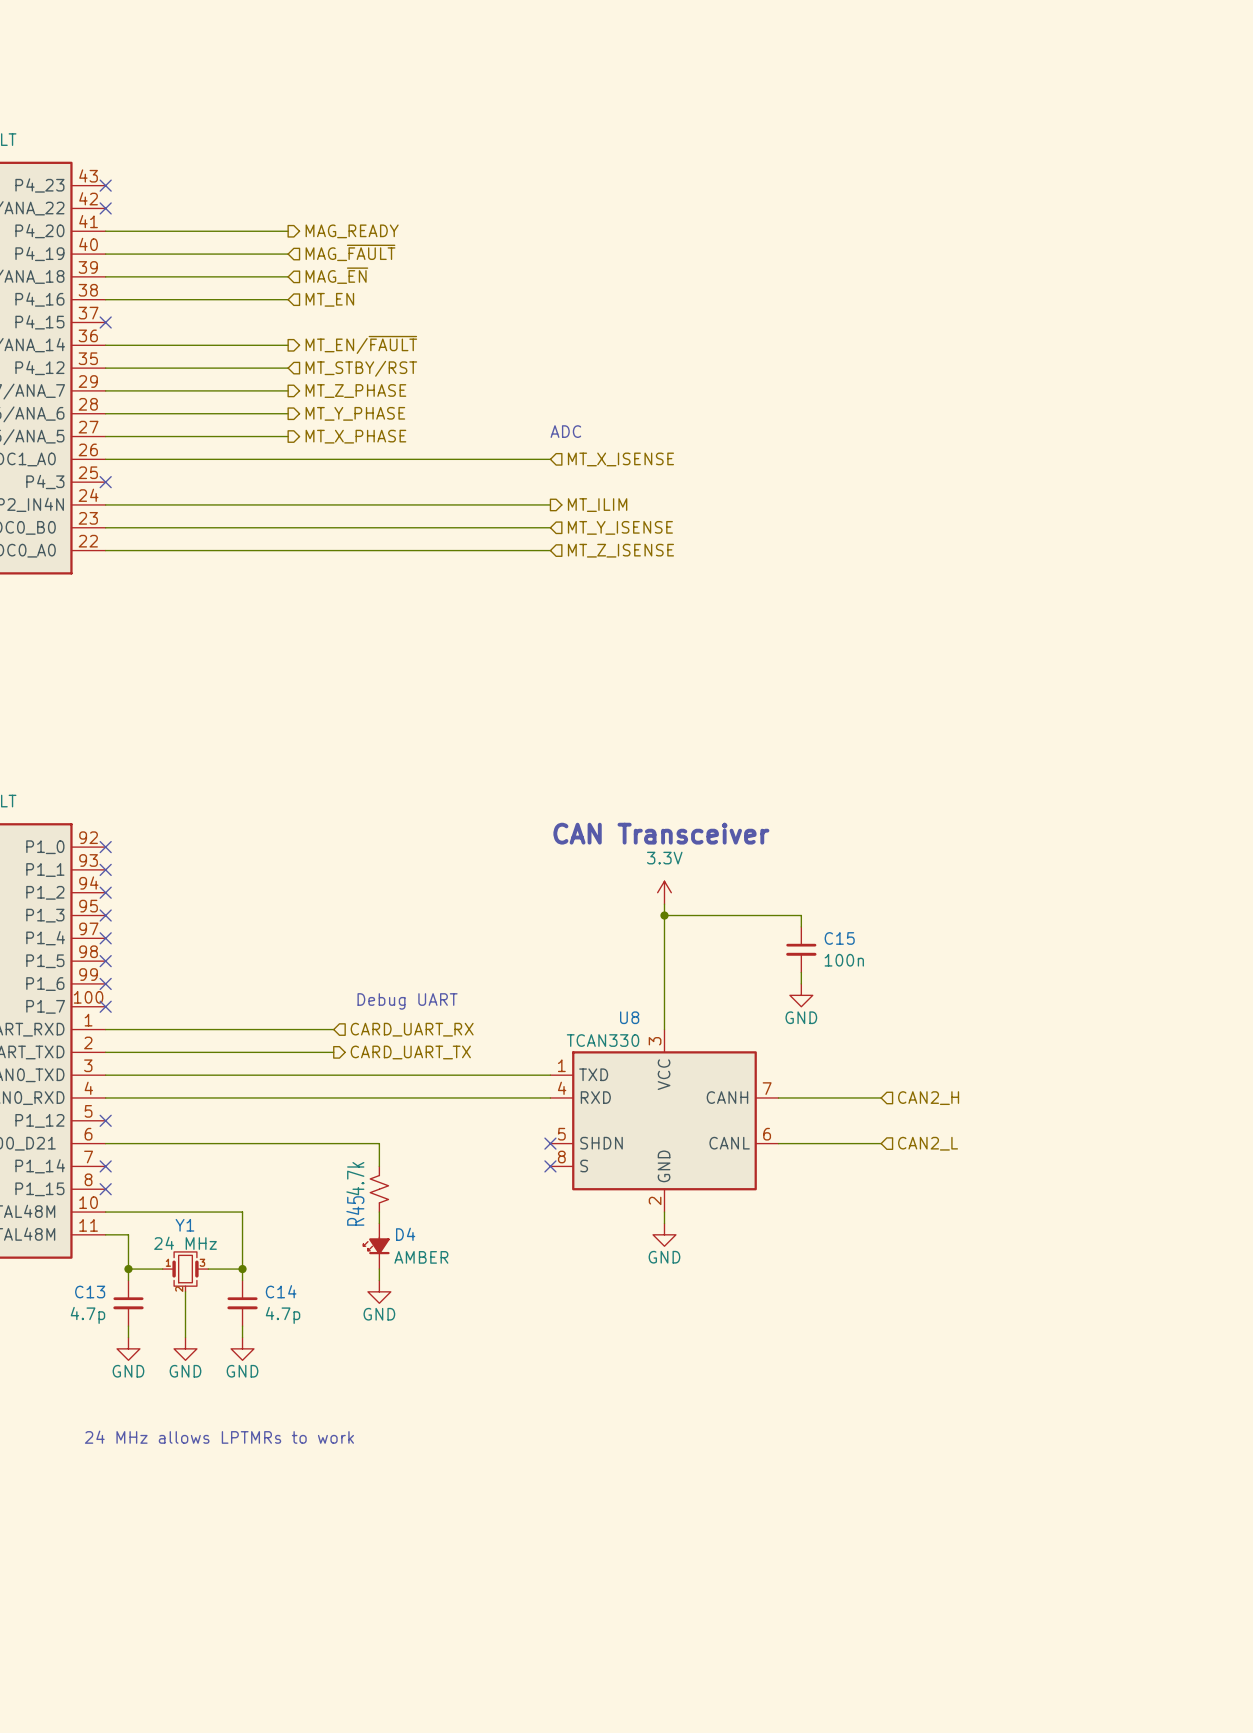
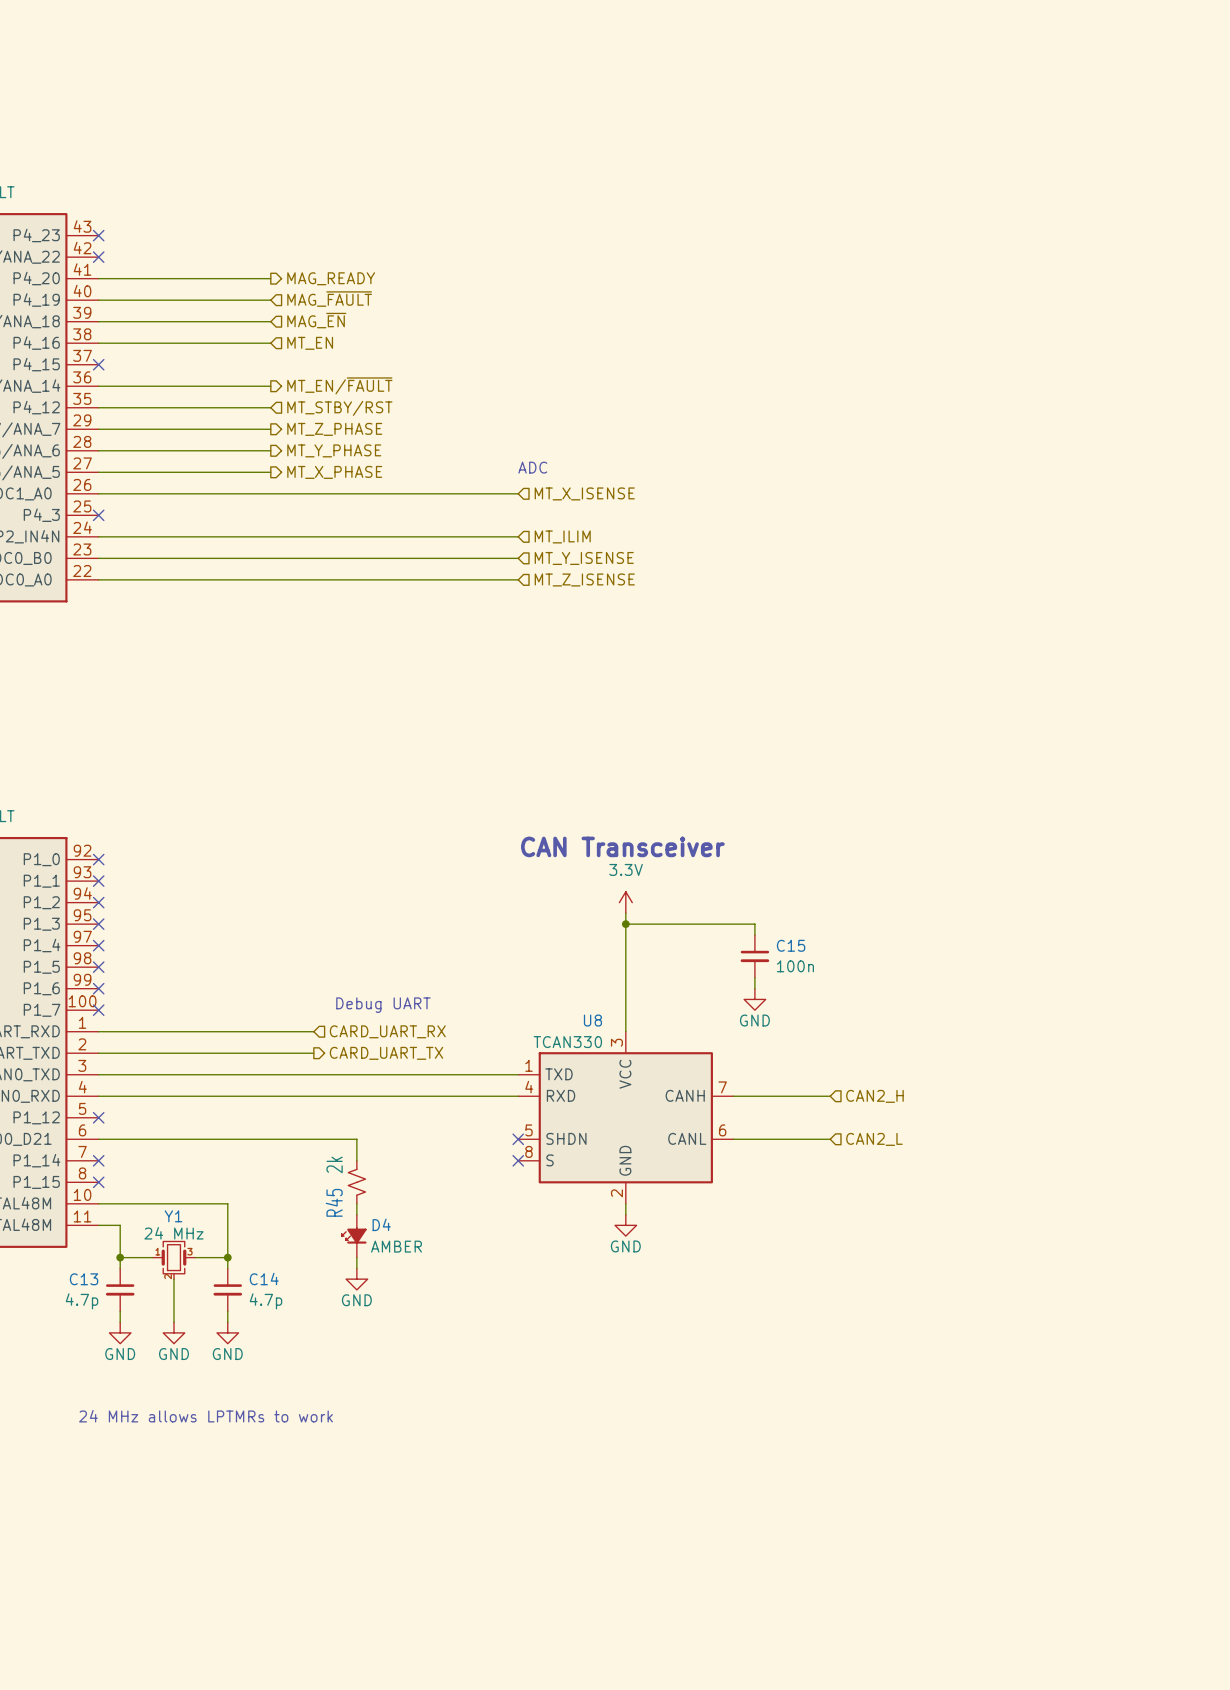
hierarchical label shape: output (597, 505) -> input (562, 536)
R45 value: 4.7k (355, 1178) -> 2k (334, 1164)

